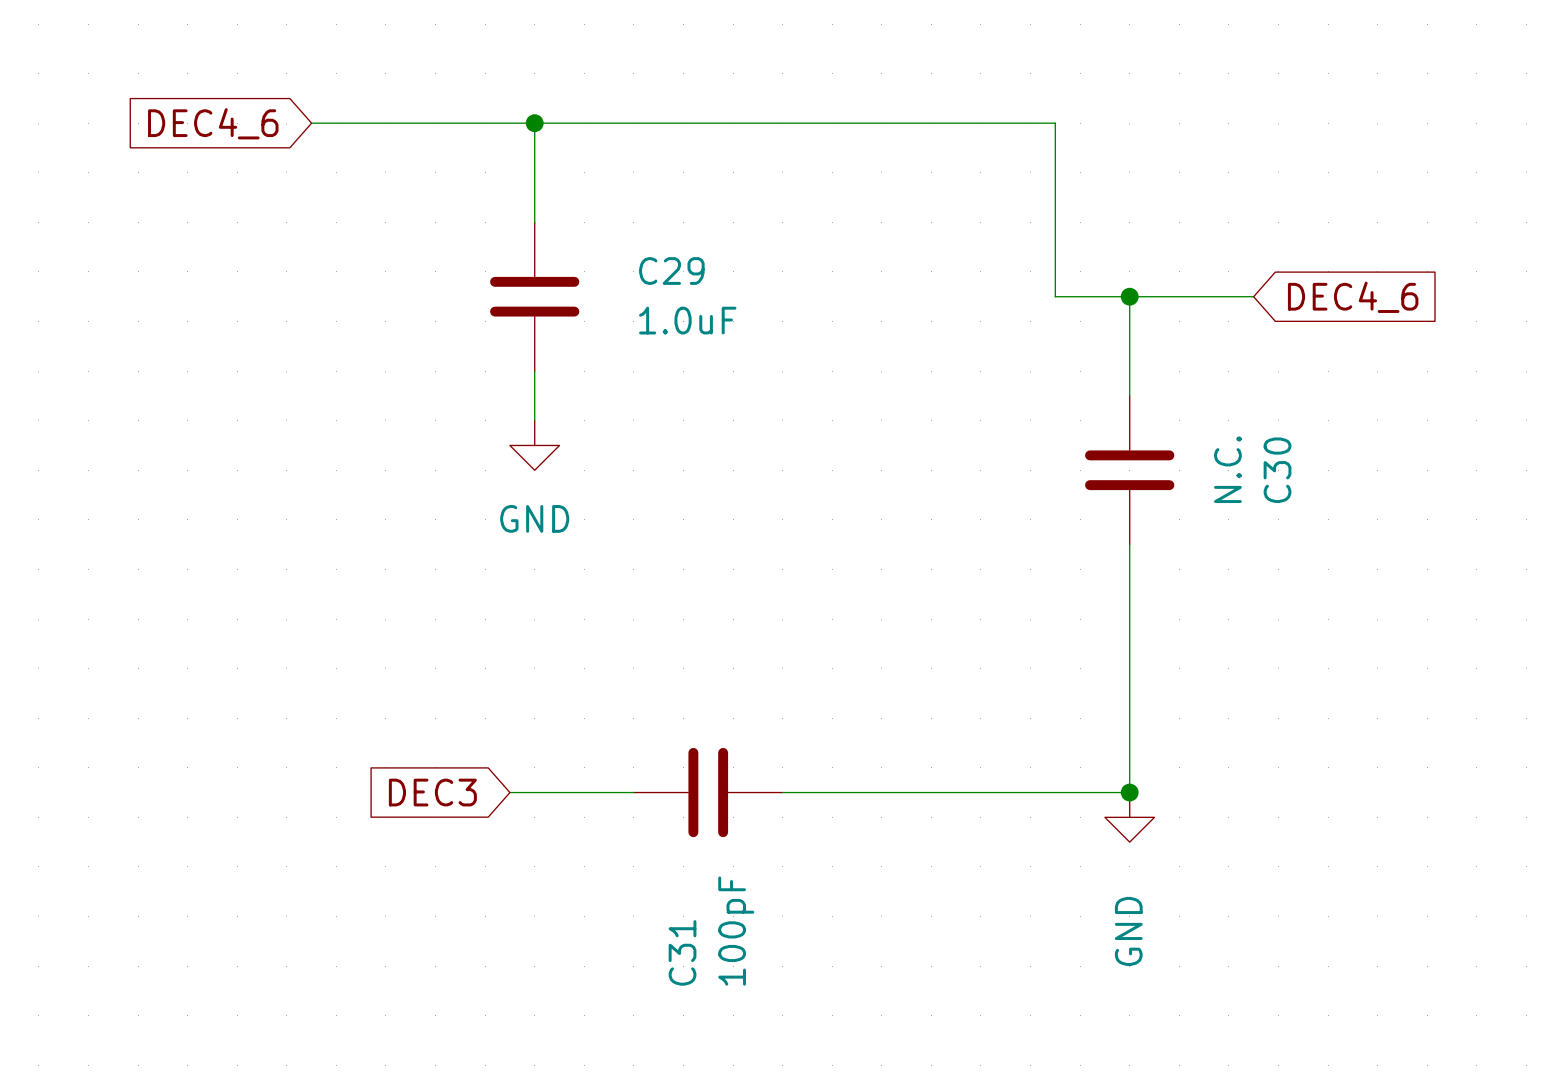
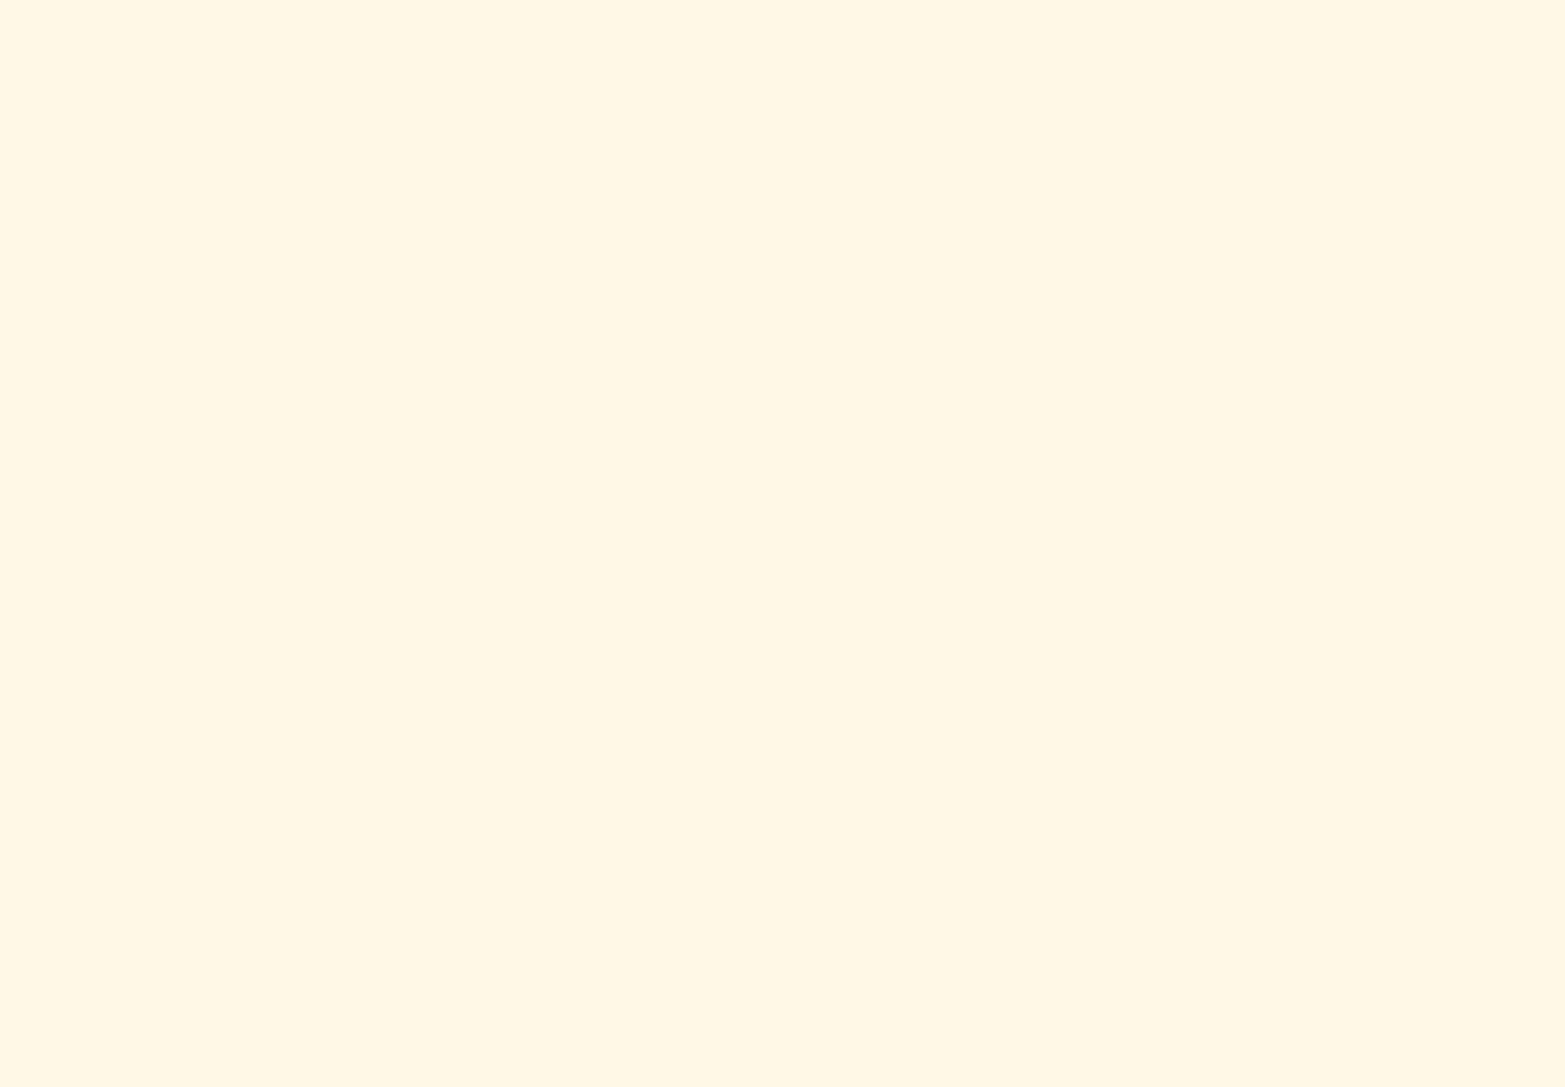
global label: DEC4_6 (213, 123) -> none
wire: (311, 123) (1055, 123) (1055, 296) (1253, 296) -> none
wire: (534, 123) (534, 222) -> none
junction: (534, 123) -> none
C29: 1.0uF (534, 296) -> none
wire: (1129, 296) (1129, 395) -> none
junction: (1129, 296) -> none
global label: DEC4_6 (1353, 297) -> none
wire: (534, 371) (534, 420) -> none
power symbol: GND (534, 445) -> none
C30: N.C. (1129, 470) -> none
wire: (1129, 544) (1129, 792) (782, 792) -> none
global label: DEC3 (432, 792) -> none
wire: (509, 792) (633, 792) -> none
C31: 100pF (708, 792) -> none
junction: (1129, 792) -> none
power symbol: GND (1129, 817) -> none

